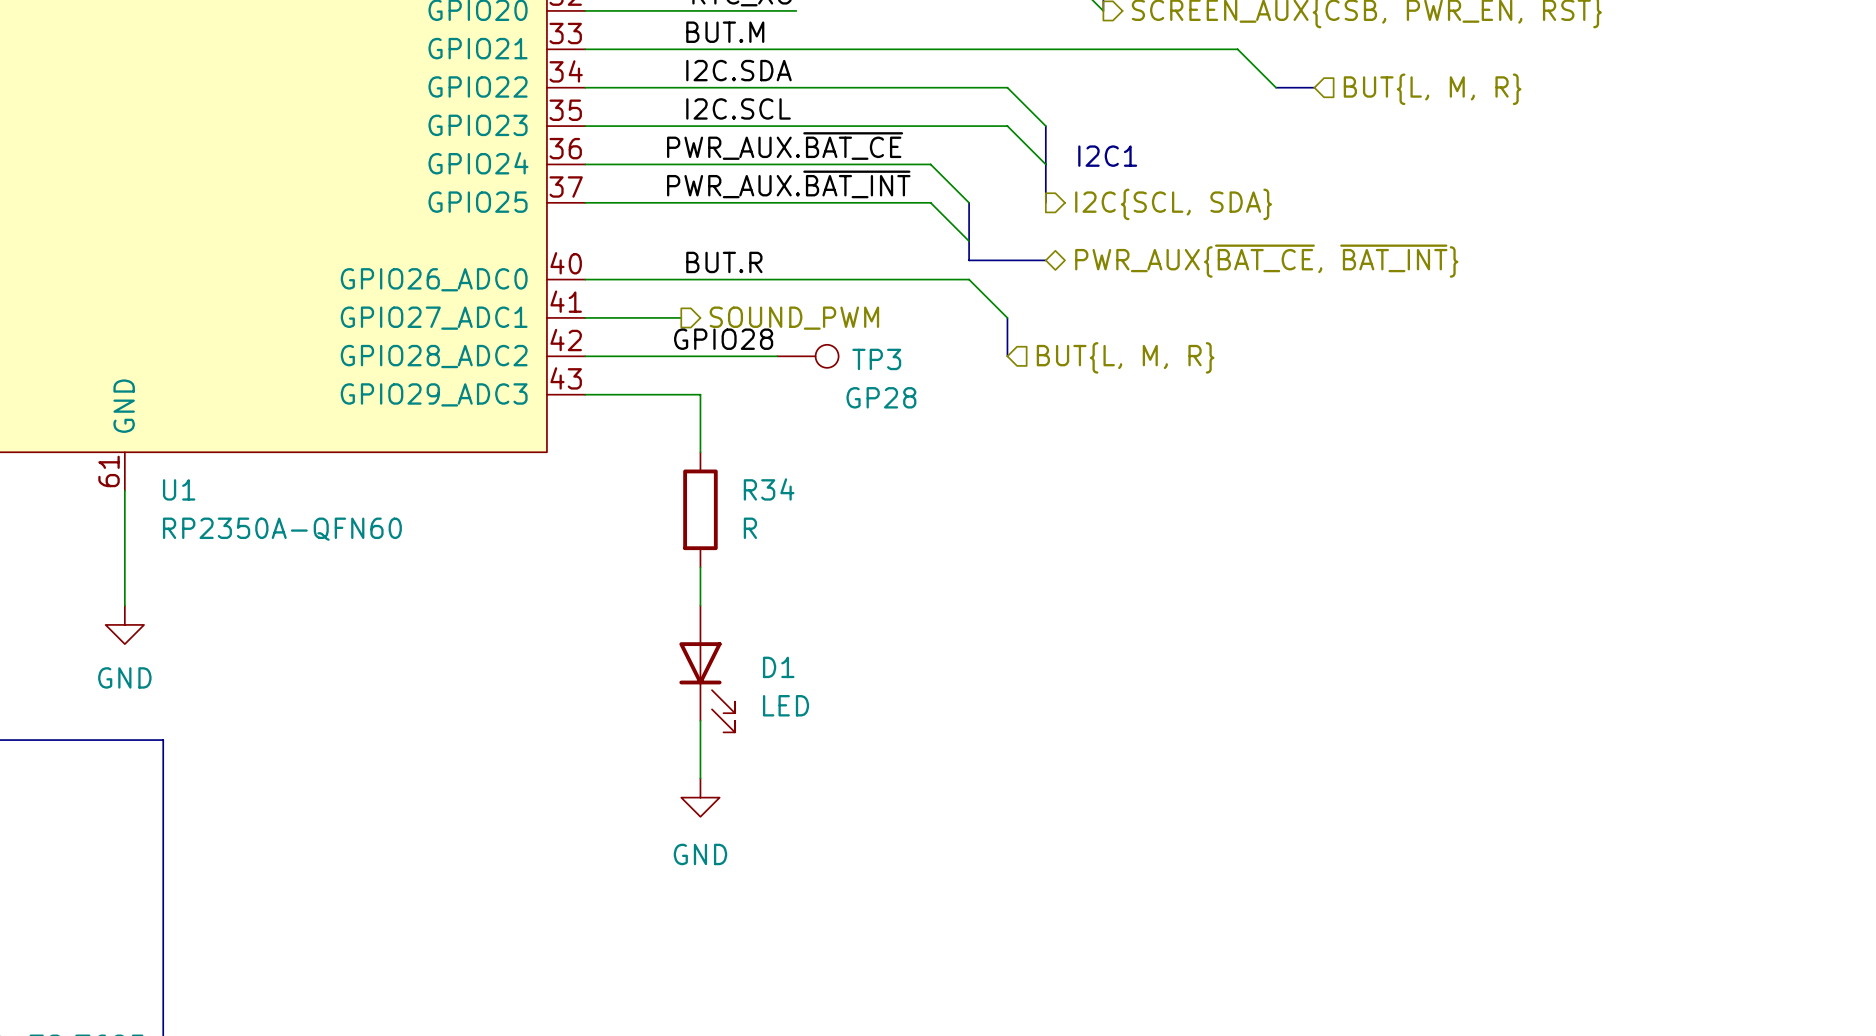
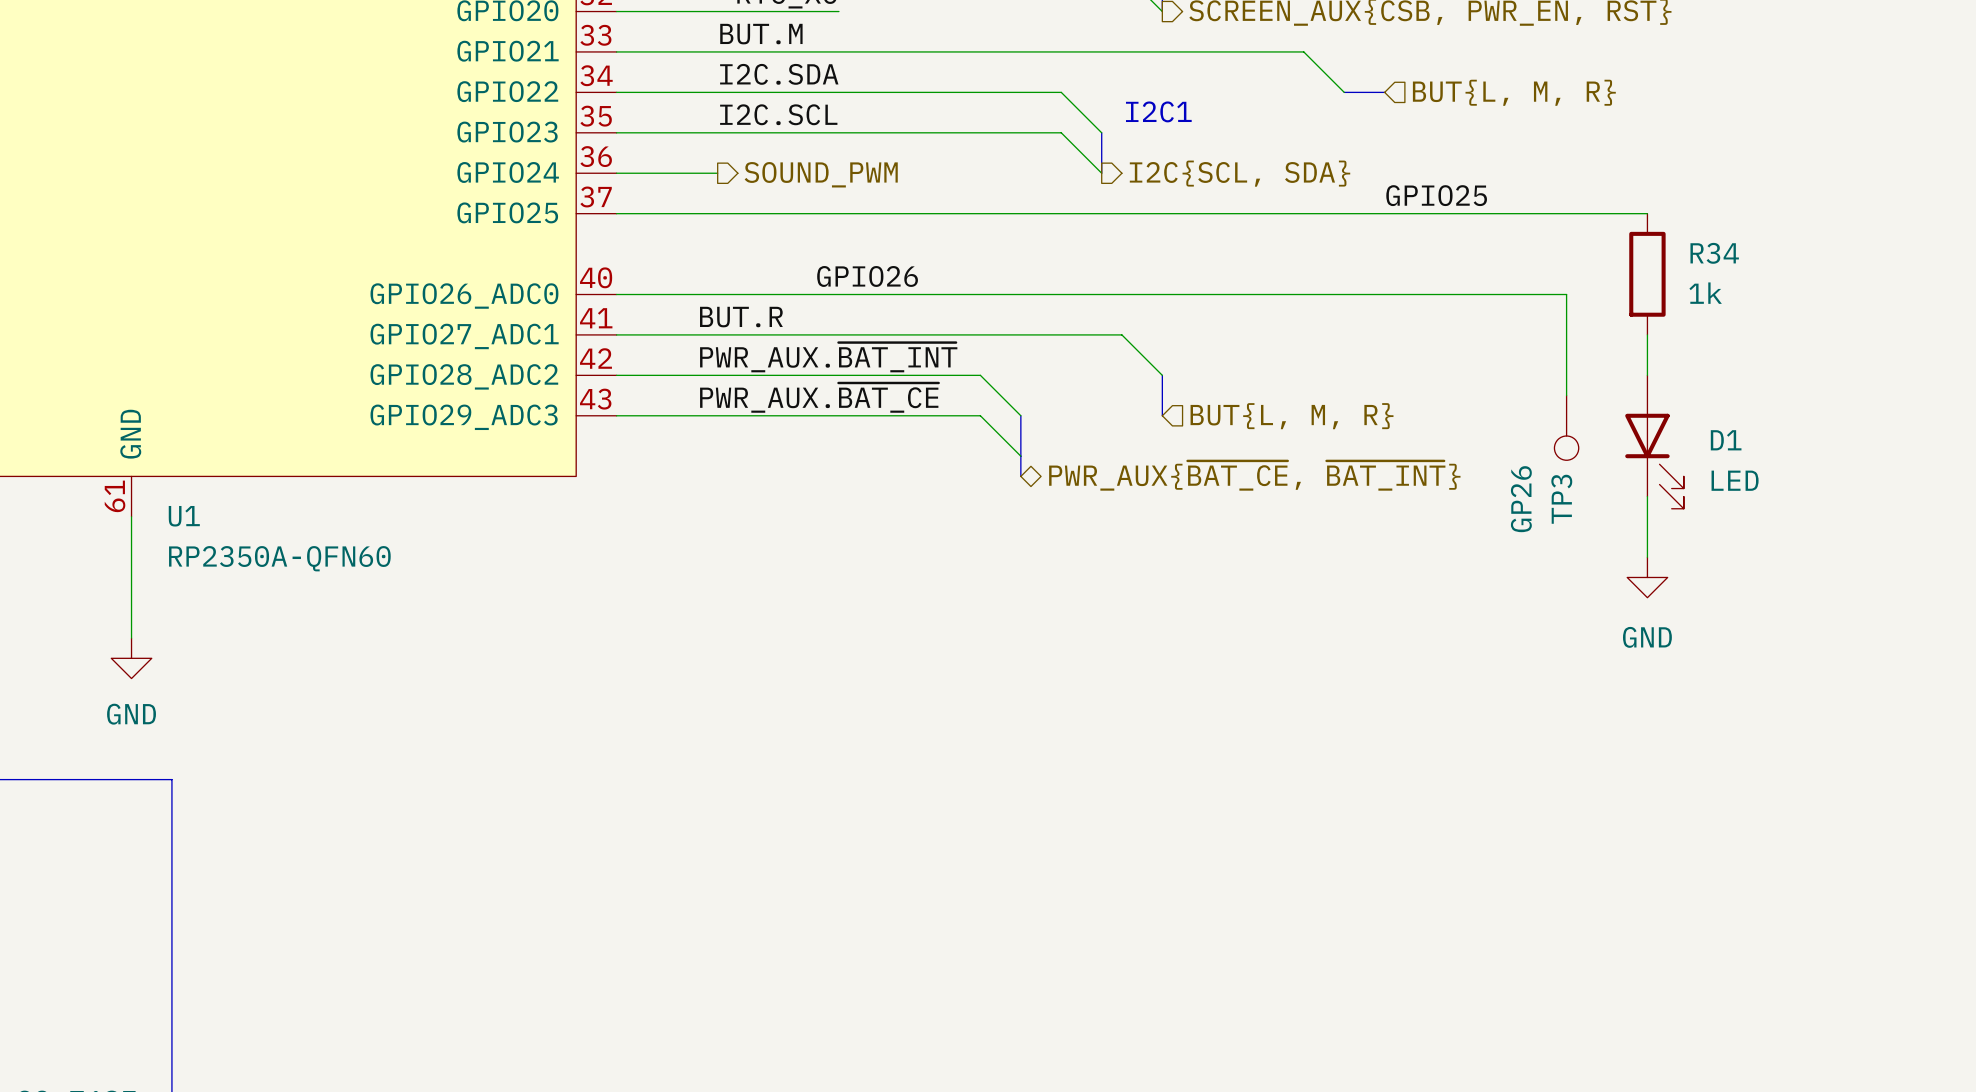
label position: PWR_AUX.~{BAT_CE} (785, 146) -> PWR_AUX.~{BAT_CE} (819, 397)
text position: I2C1 (1107, 156) -> I2C1 (1158, 111)
wire: (681, 164) (930, 164) (969, 202) -> none
bus: (1045, 164) (1045, 202) -> none
label position: PWR_AUX.~{BAT_INT} (788, 184) -> PWR_AUX.~{BAT_INT} (828, 357)
label: none -> GPIO25 (1436, 195)
wire: (930, 202) (969, 241) -> (980, 213) (1647, 213)
bus: (969, 202) (969, 260) (1045, 260) -> none
hierarchical label position: I2C{SCL, SDA} (1173, 204) -> I2C{SCL, SDA} (1240, 173)
hierarchical label position: PWR_AUX{~{BAT_CE}, ~{BAT_INT}} (1266, 261) -> PWR_AUX{~{BAT_CE}, ~{BAT_INT}} (1254, 475)
label position: BUT.R (724, 262) -> BUT.R (741, 317)
label: none -> GPIO26 (867, 276)
wire: (969, 279) (1007, 317) -> (1020, 294) (1566, 294) (1566, 395)
wire: none -> (717, 334) (1121, 334) (1162, 375)
bus: (1007, 317) (1007, 356) -> (1162, 375) (1162, 415)
wire: none -> (1647, 334) (1647, 375)
hierarchical label position: SOUND_PWM (794, 318) -> SOUND_PWM (821, 174)
label: GPIO28 (723, 339) -> none
wire: none -> (818, 375) (980, 375) (1020, 415)
TP3 position: (807, 356) -> (1566, 427)
TP3 rotation: 0° (827, 356) -> 90° clockwise (1566, 448)
hierarchical label position: BUT{L, M, R} (1125, 357) -> BUT{L, M, R} (1292, 416)
wire: (700, 394) (700, 452) -> (737, 415) (980, 415) (1020, 456)
bus: none -> (1020, 415) (1020, 476)
TP3 value: GP28 (881, 397) -> GP26 (1521, 499)
wire: none -> (1647, 496) (1647, 557)
R34 position: (700, 509) -> (1647, 274)
R34 value: R (750, 528) -> 1k (1705, 293)
power symbol: none -> GND (1647, 577)
wire: (700, 567) (700, 605) -> none
D1 position: (707, 669) -> (1654, 442)
wire: (700, 720) (700, 778) -> none
power symbol: GND (700, 797) -> none

